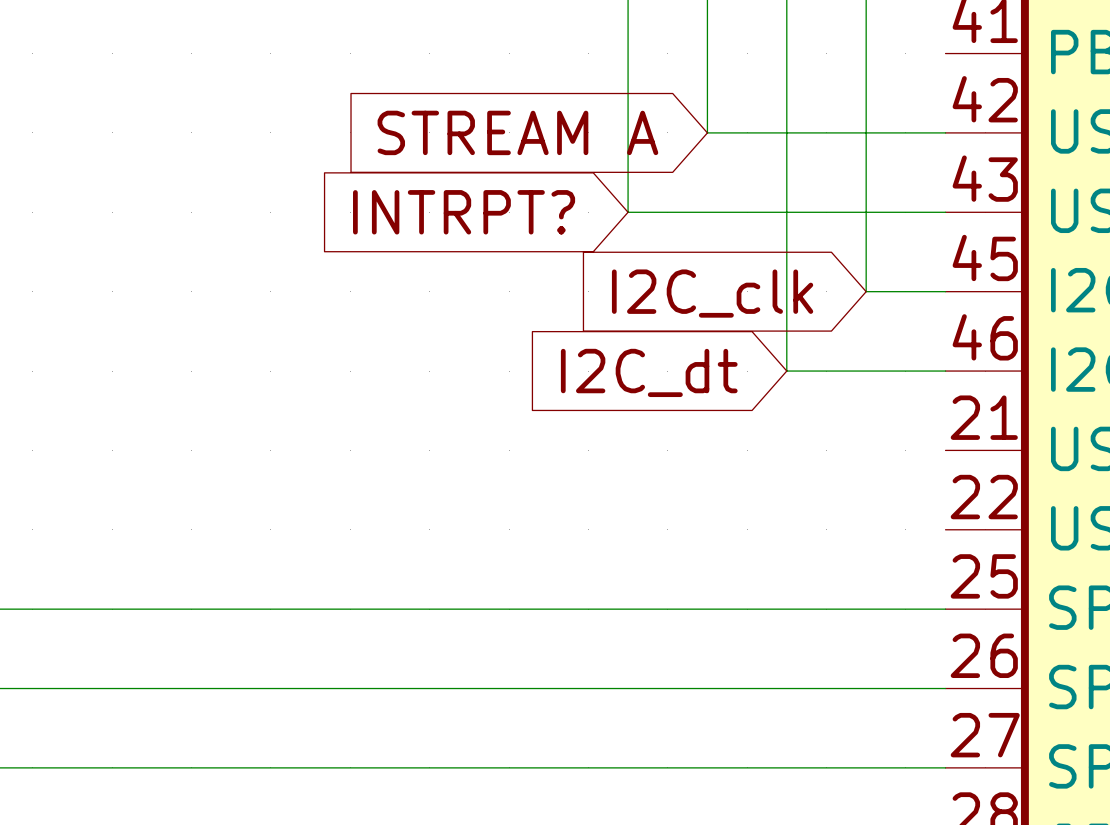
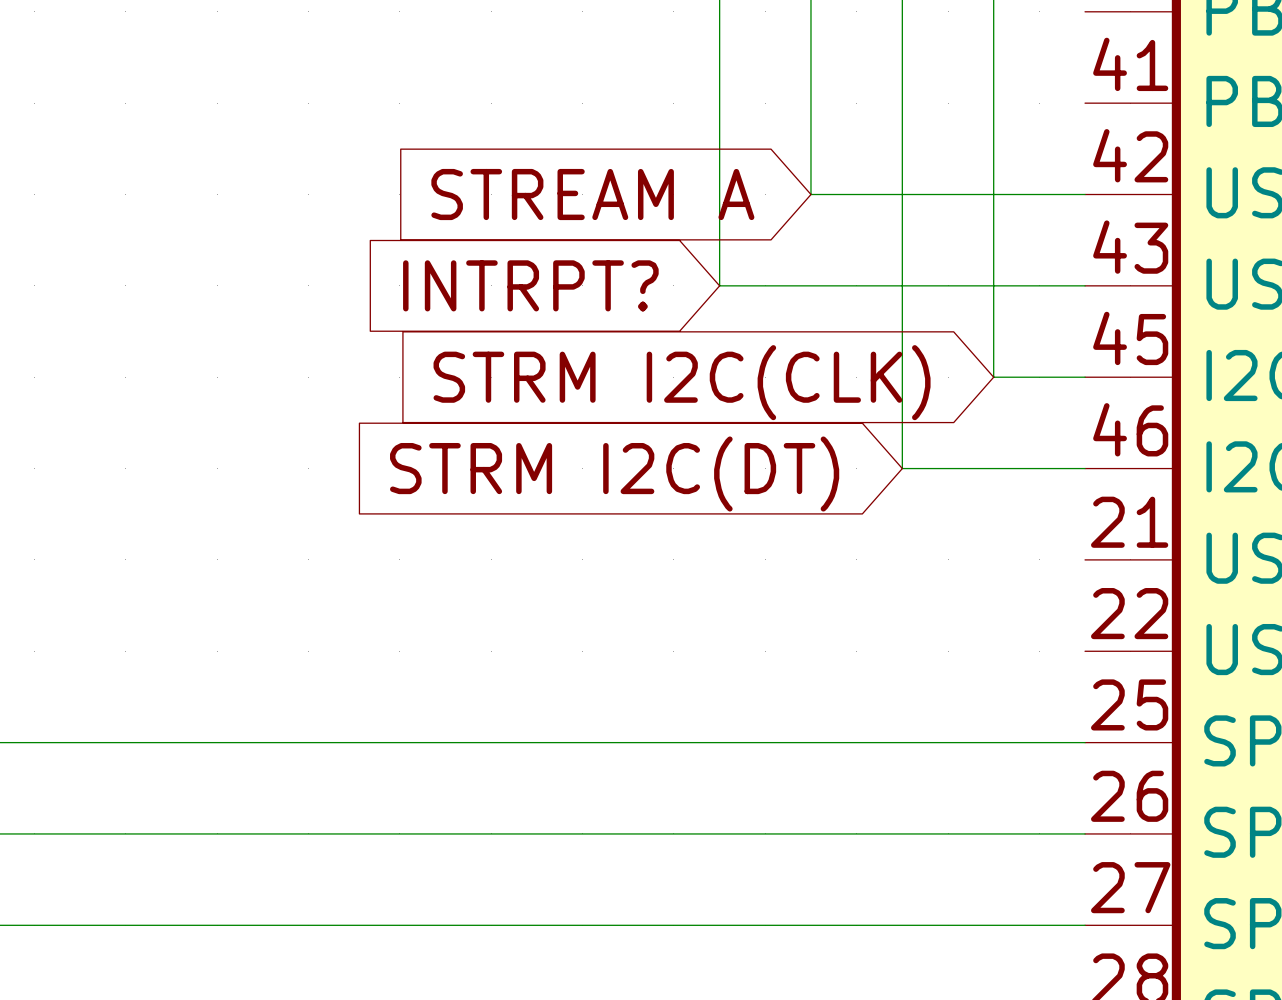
global label: I2C_clk (712, 293) -> STRM I2C(CLK) (682, 382)
global label: I2C_dt (649, 372) -> STRM I2C(DT) (614, 474)

